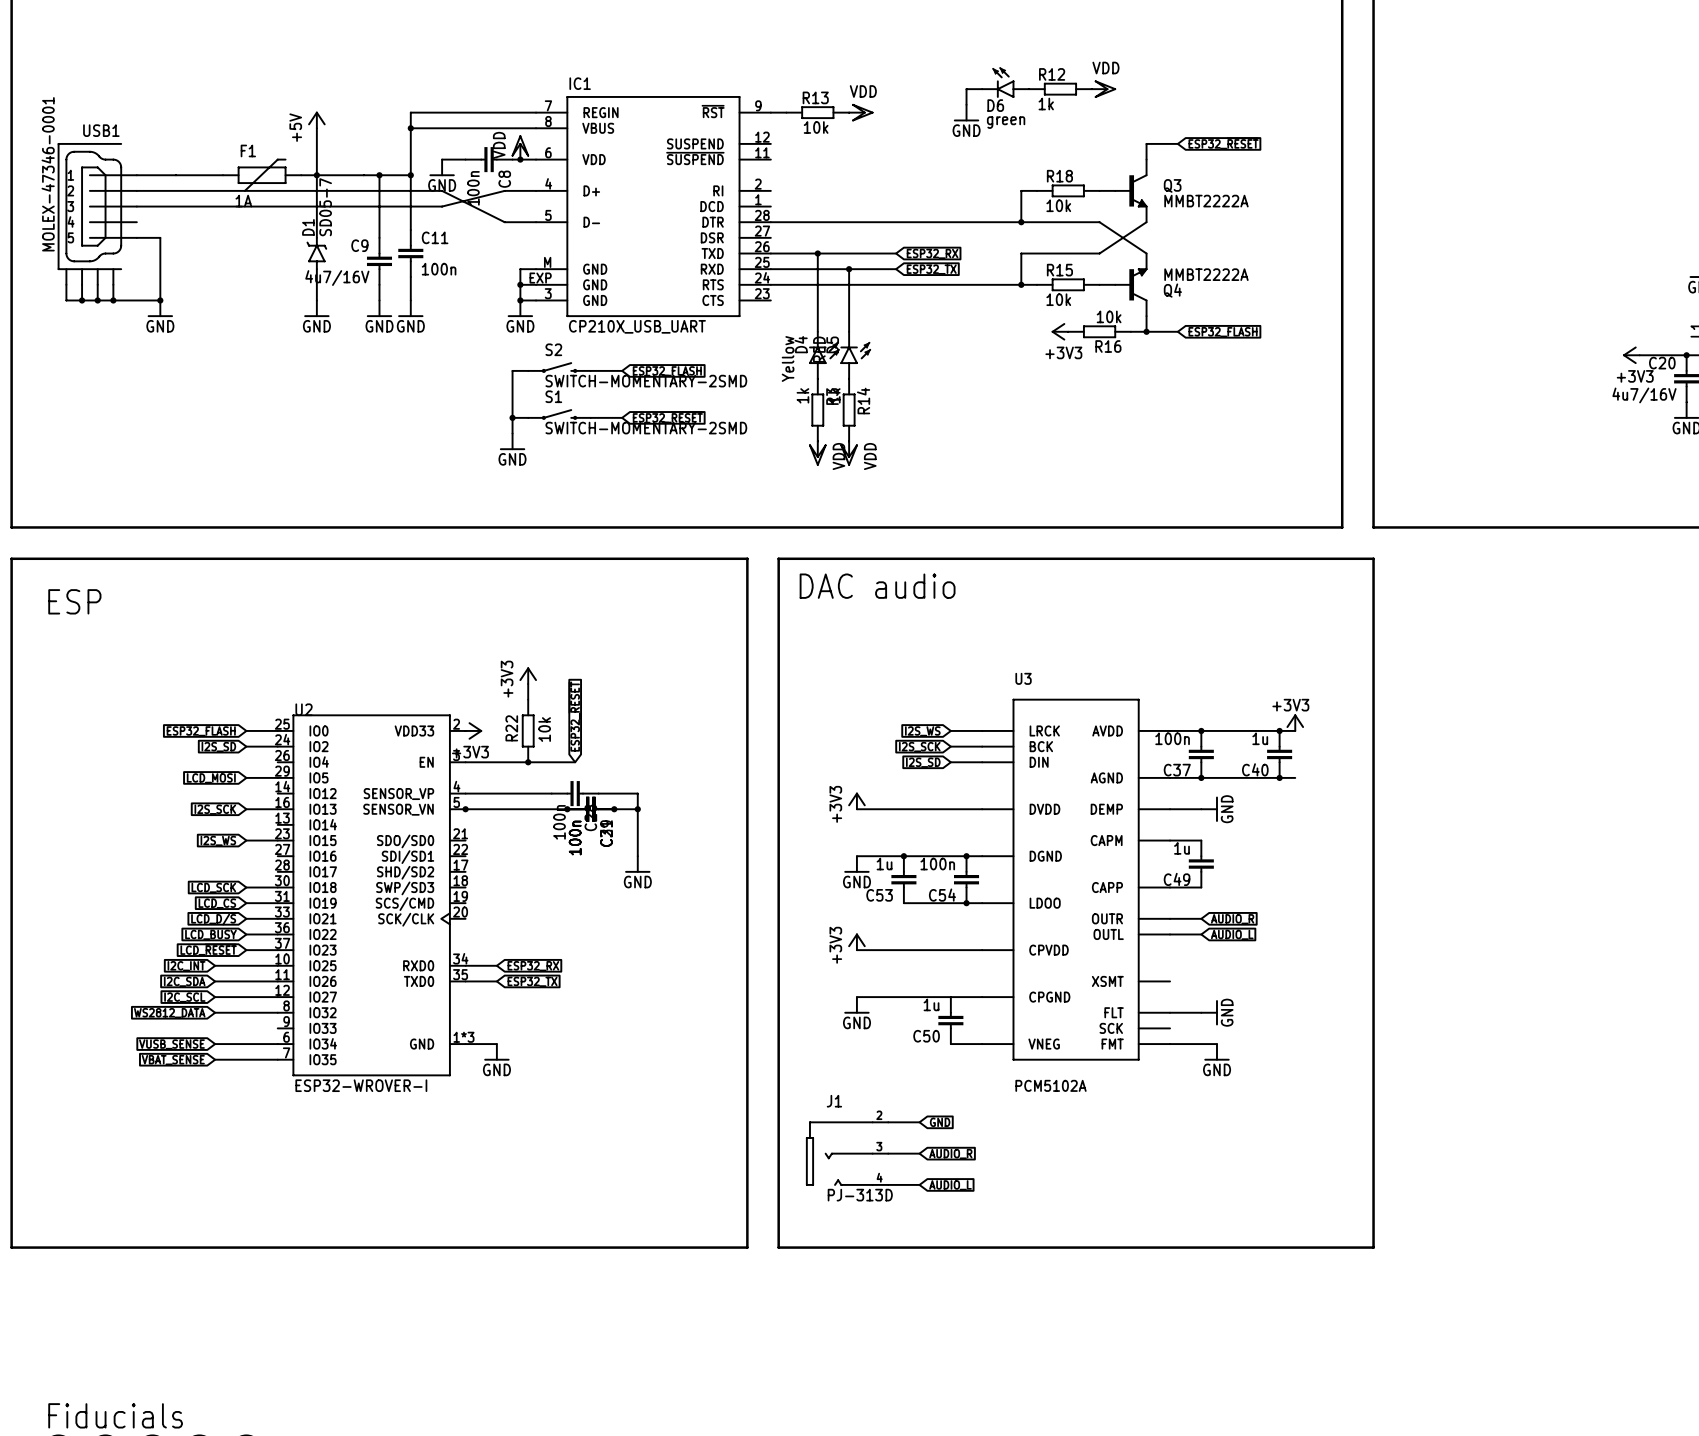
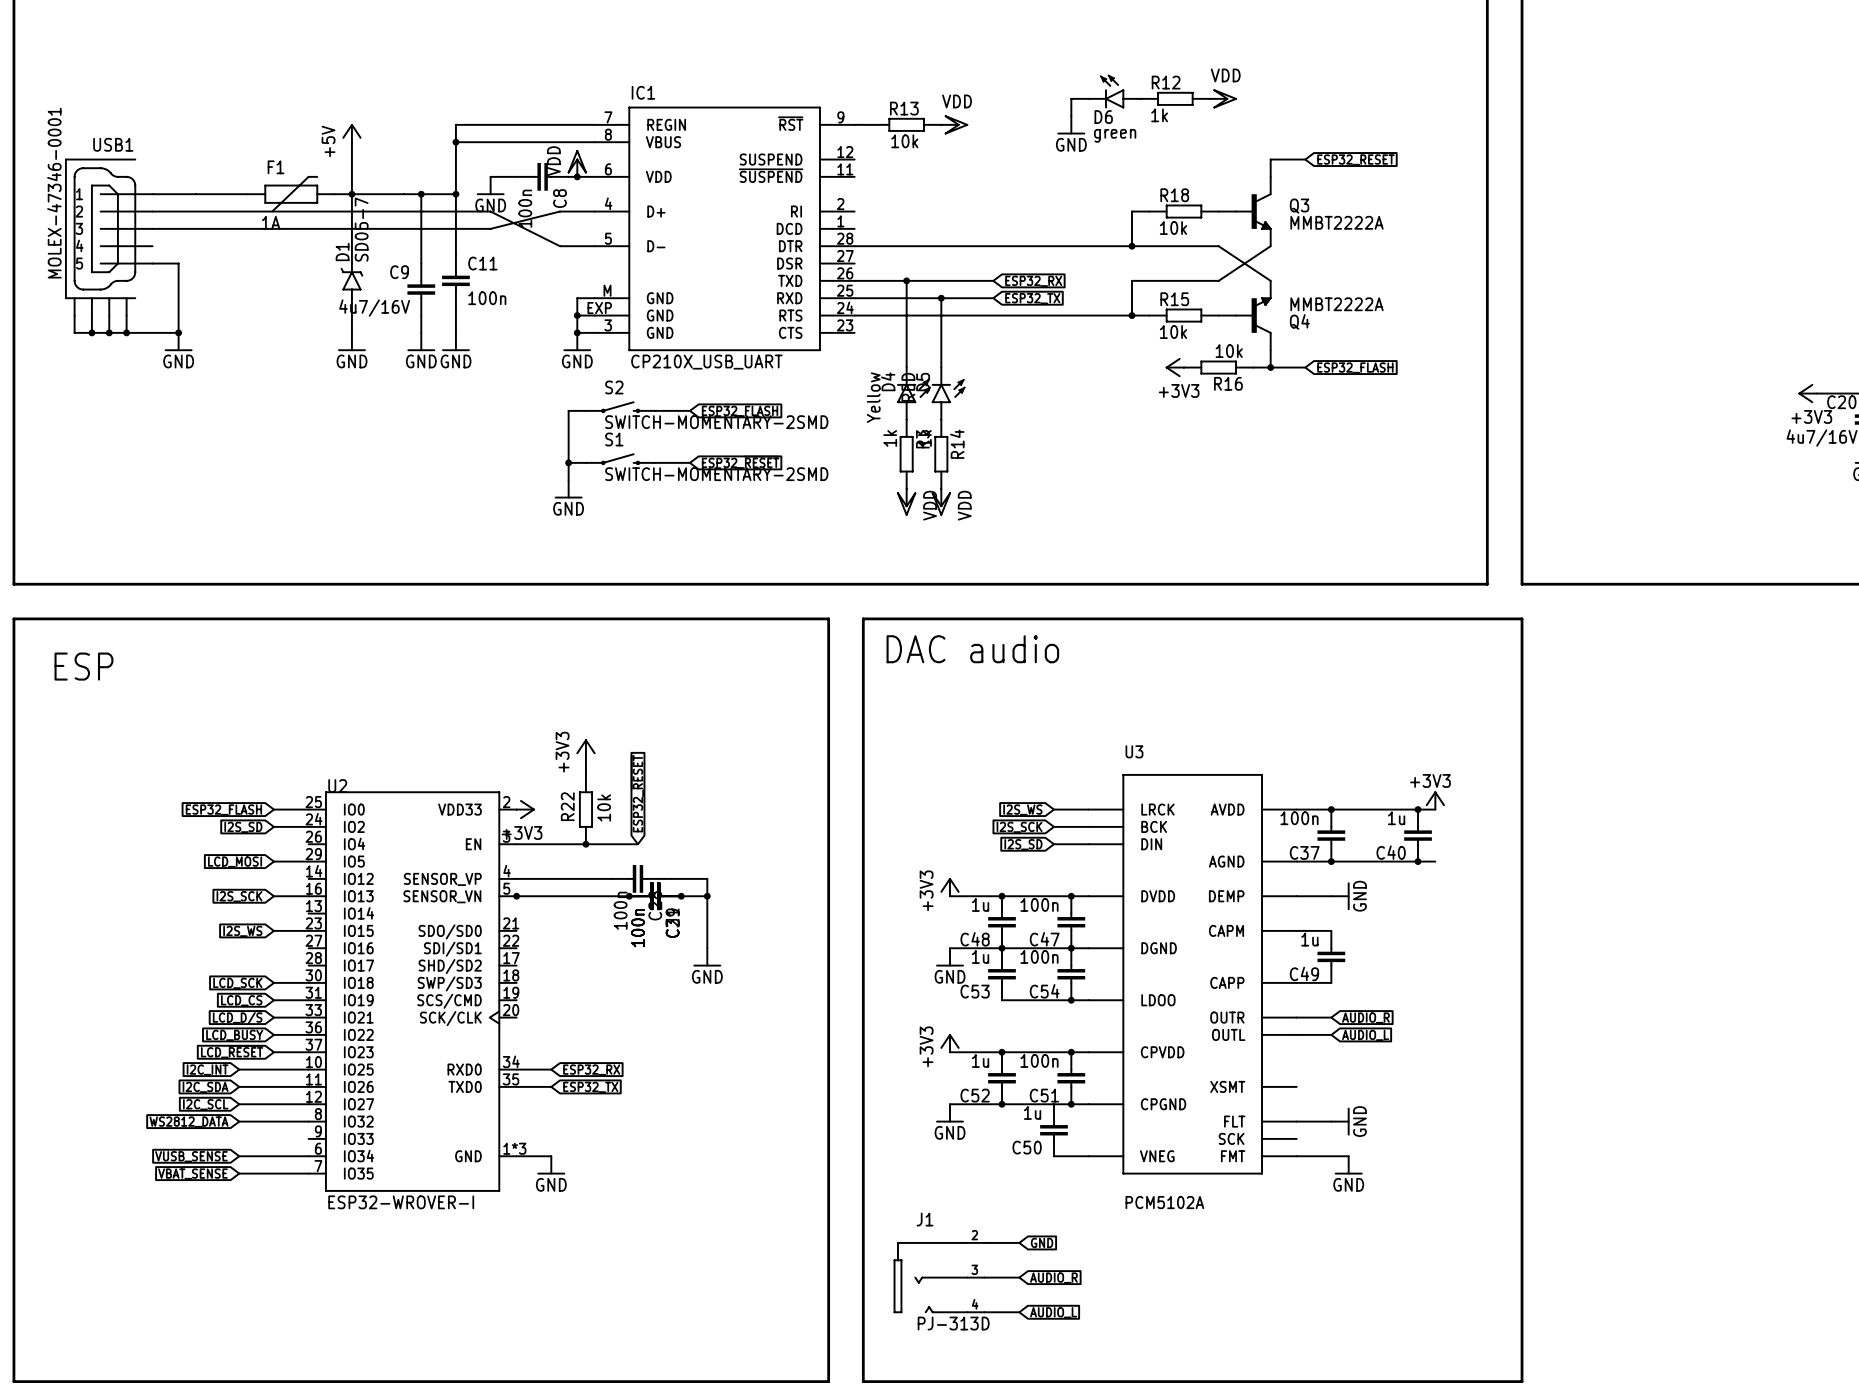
junction: none -> (1001, 896)
junction: none -> (1071, 896)
C48: none -> 1u (1001, 922)
C47: none -> 100n (1071, 922)
junction: none -> (1001, 1052)
junction: none -> (1071, 1052)
C52: none -> 1u (1001, 1078)
C51: none -> 100n (1071, 1078)
junction: none -> (1001, 1104)
junction: none -> (1071, 1104)

